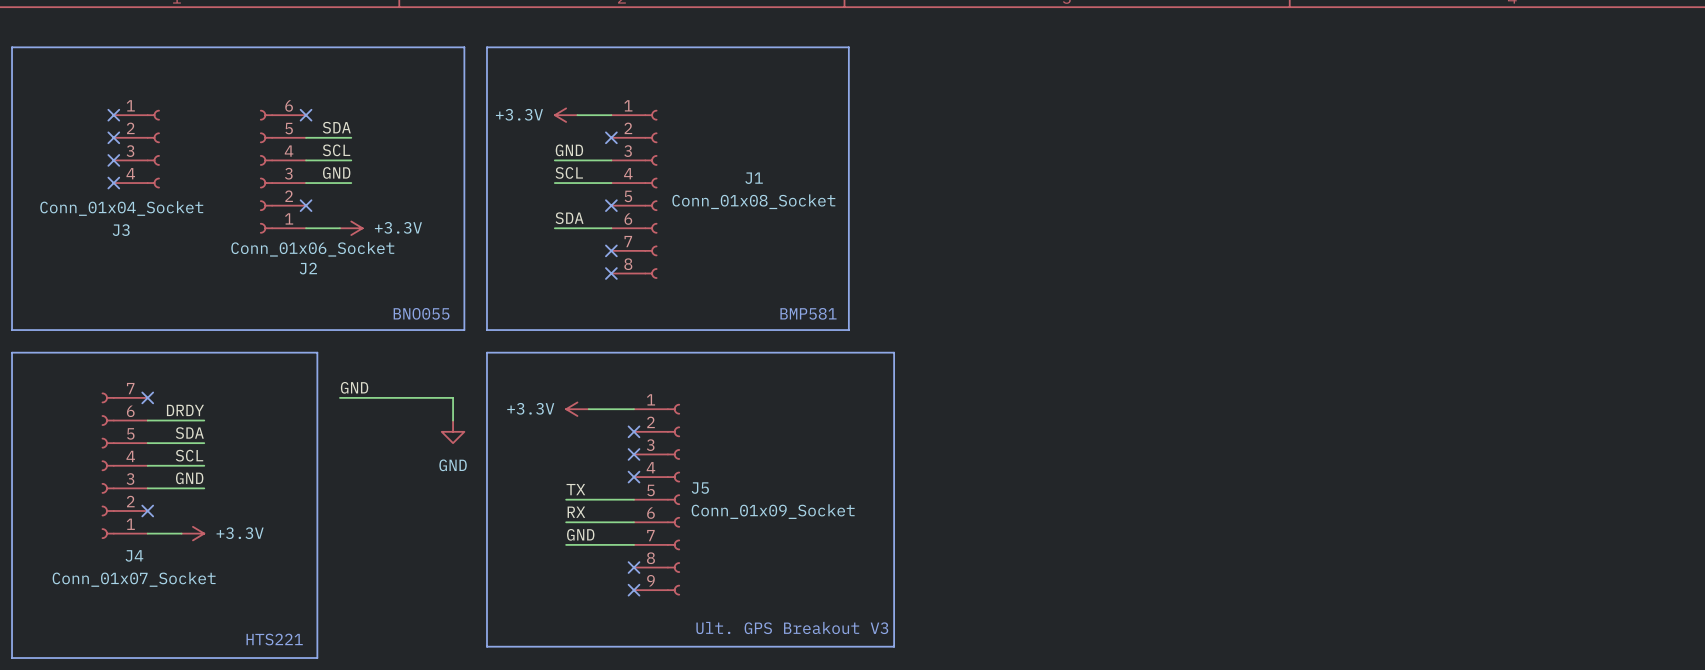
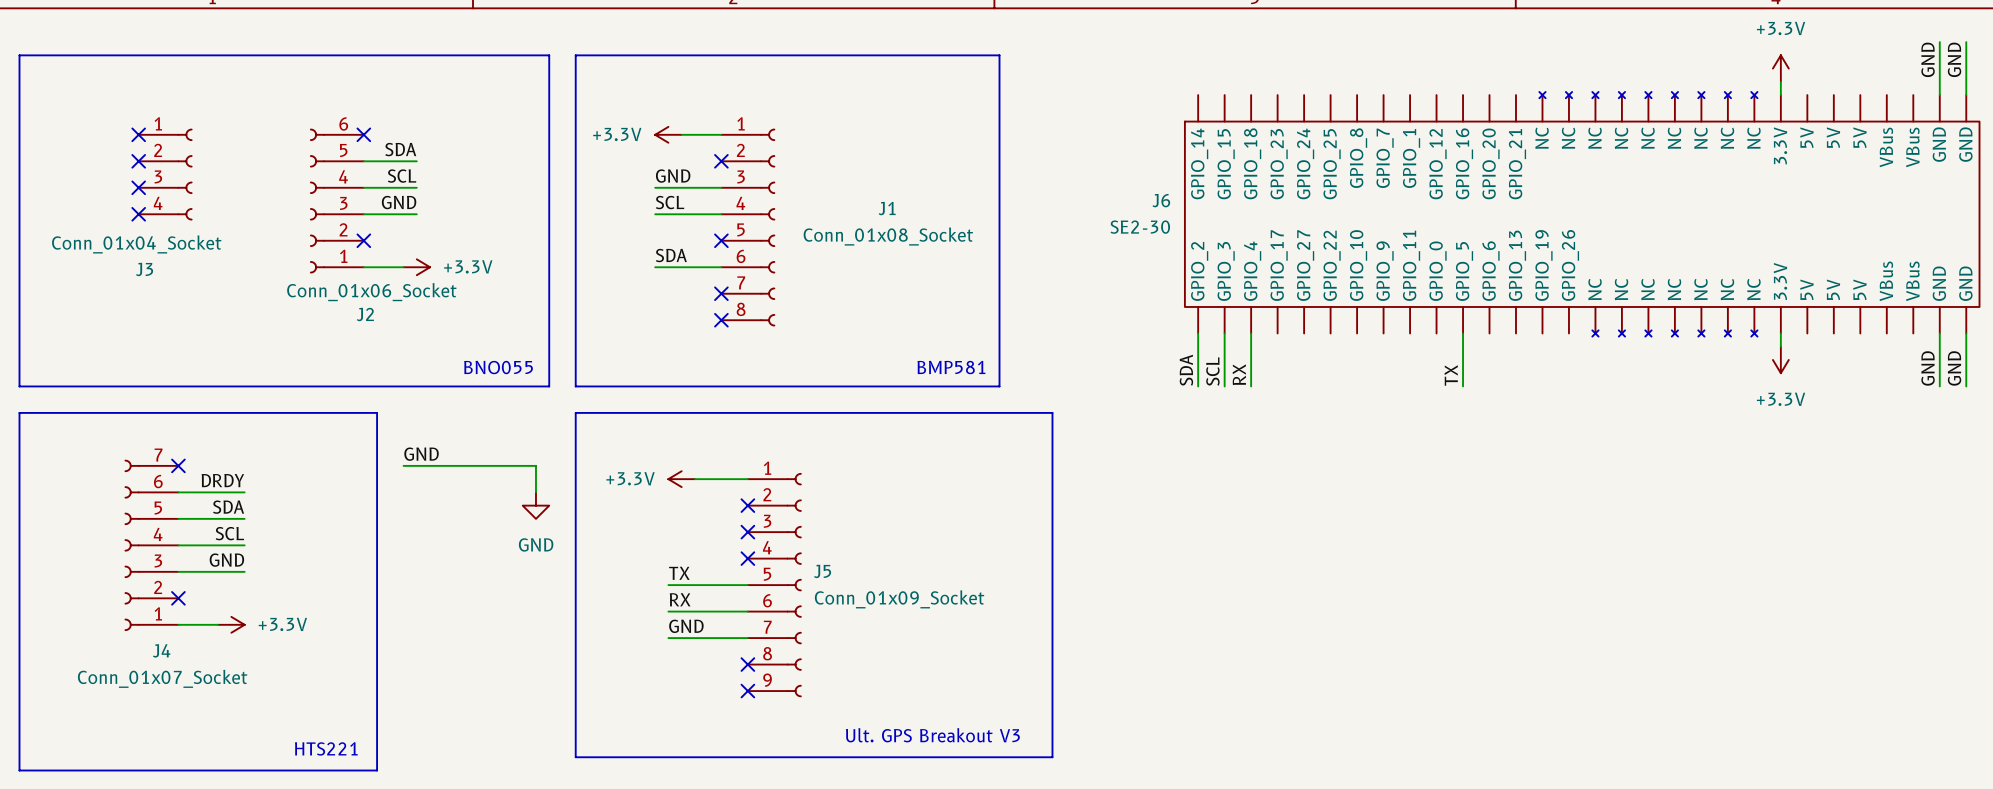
wire: none -> (1939, 42) (1939, 95)
wire: none -> (1966, 42) (1966, 95)
label: none -> GND (1928, 59)
label: none -> GND (1954, 59)
power symbol: none -> +3.3V (1780, 68)
wire: none -> (1780, 81) (1780, 95)
J6: none -> SE2-30 (1582, 214)
wire: none -> (1198, 333) (1198, 386)
wire: none -> (1224, 333) (1224, 386)
wire: none -> (1251, 333) (1251, 386)
wire: none -> (1463, 333) (1463, 386)
wire: none -> (1780, 333) (1780, 346)
wire: none -> (1939, 333) (1939, 386)
wire: none -> (1966, 333) (1966, 386)
power symbol: none -> +3.3V (1780, 359)
label: none -> SDA (1186, 370)
label: none -> SCL (1212, 371)
label: none -> GND (1928, 368)
label: none -> GND (1954, 368)
label: none -> RX (1239, 374)
label: none -> TX (1451, 375)

